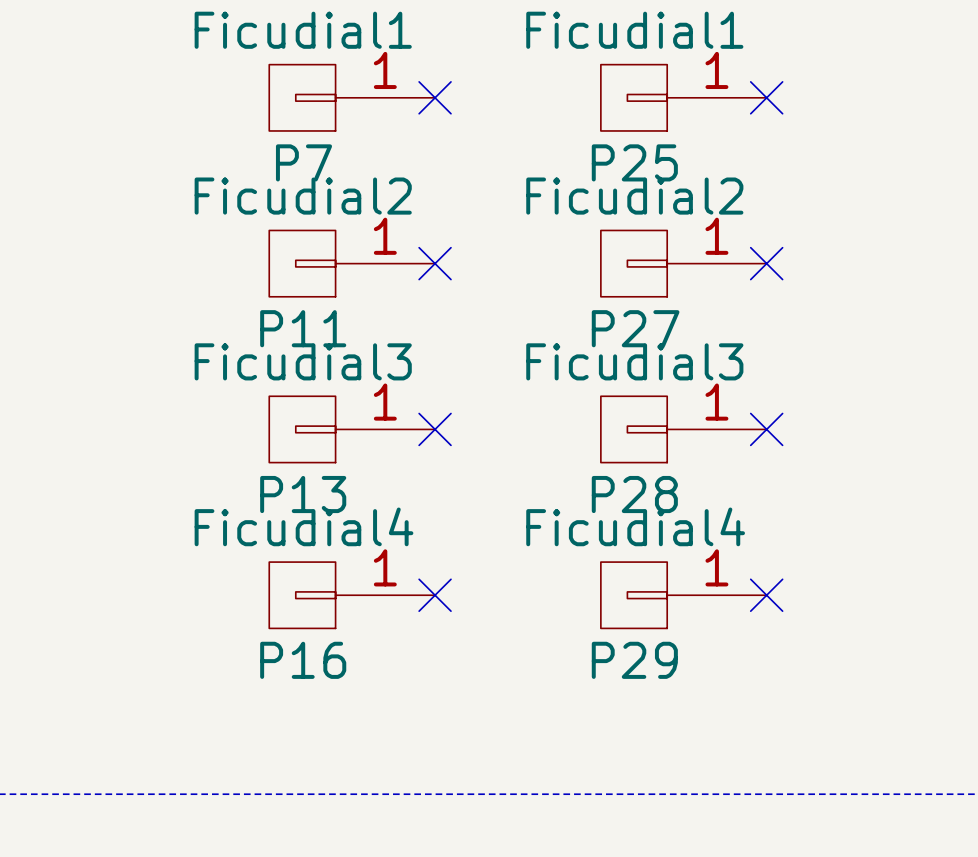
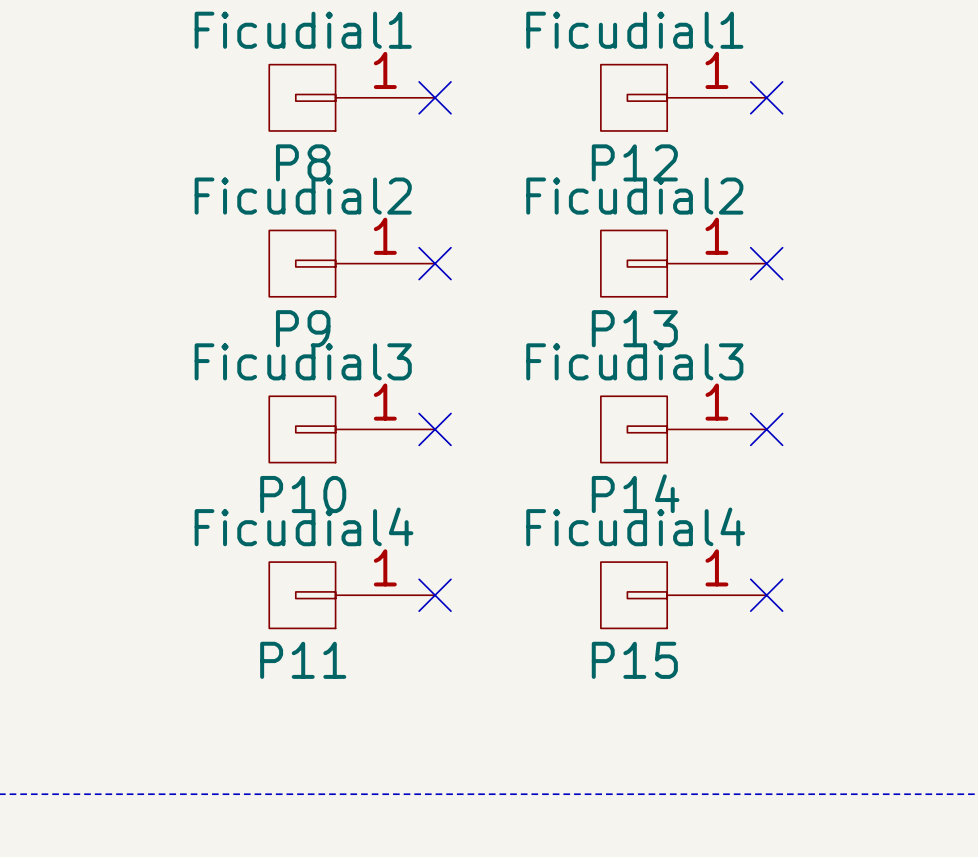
P7 name: P7 (303, 162) -> P8 (303, 162)
P25 name: P25 (634, 162) -> P12 (634, 162)
P11 name: P11 (303, 328) -> P9 (303, 328)
P27 name: P27 (635, 328) -> P13 (634, 328)
P13 name: P13 (303, 494) -> P10 (303, 494)
P28 name: P28 (634, 494) -> P14 (635, 493)
P16 name: P16 (303, 660) -> P11 (303, 660)
P29 name: P29 (634, 660) -> P15 (634, 660)

